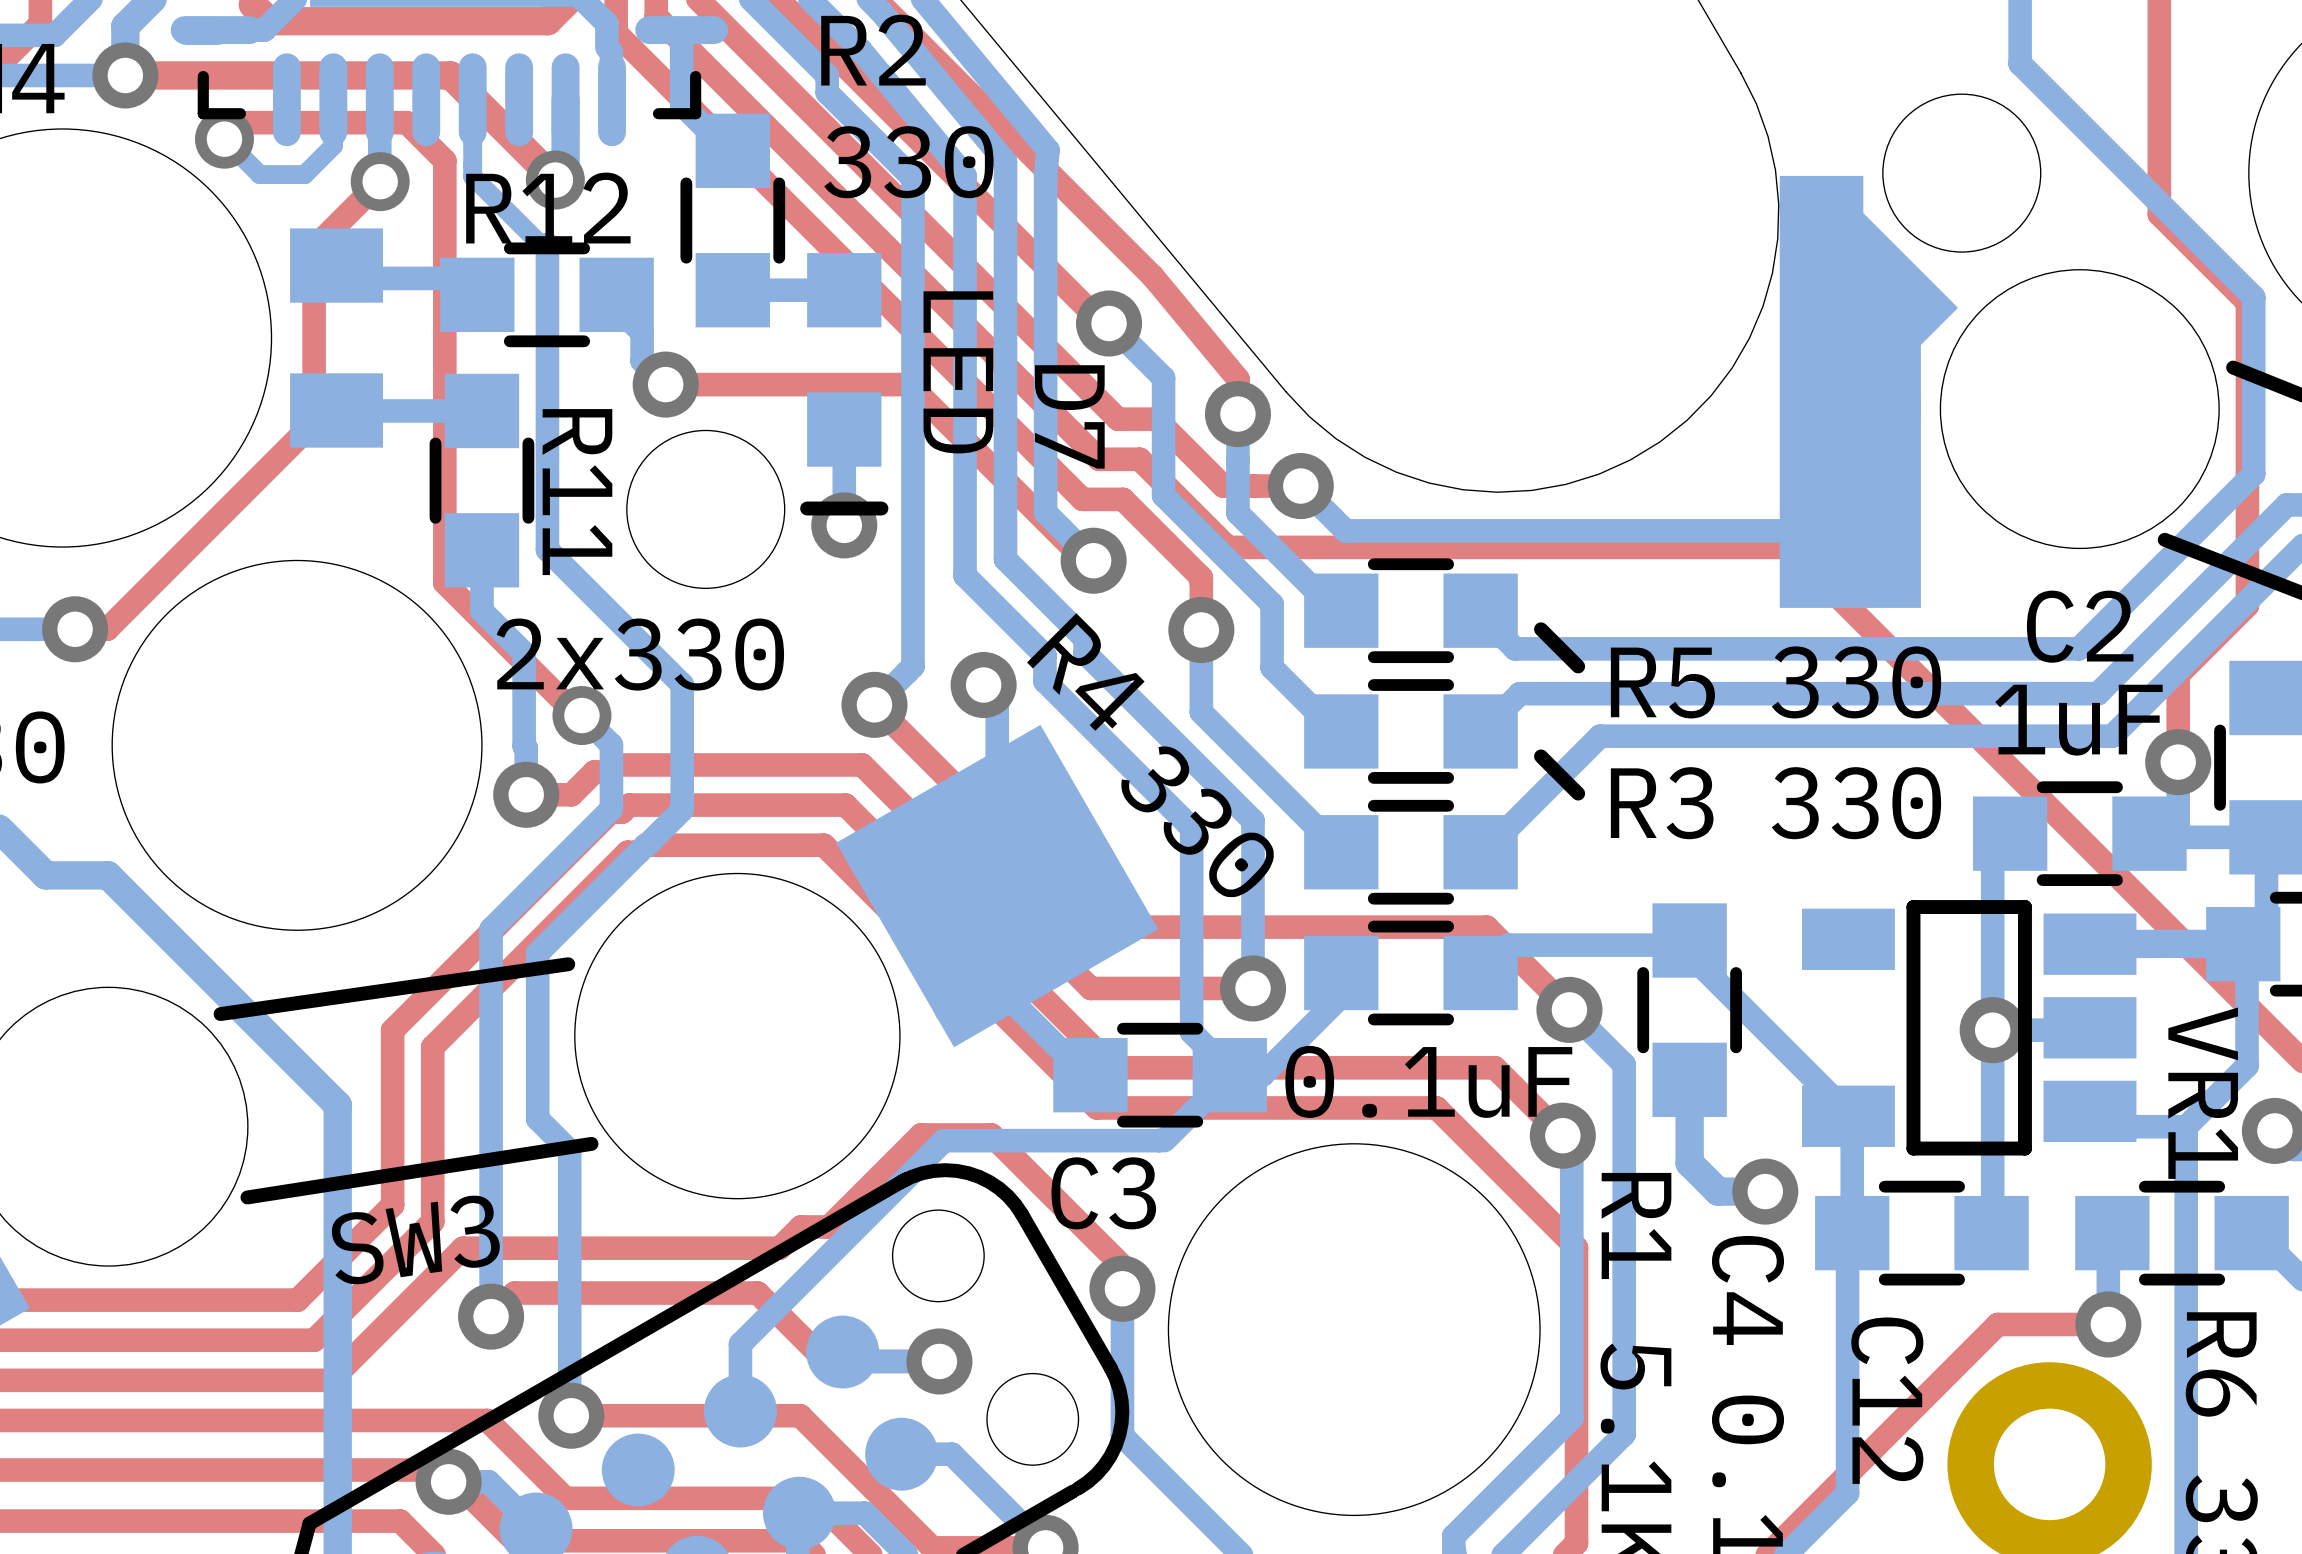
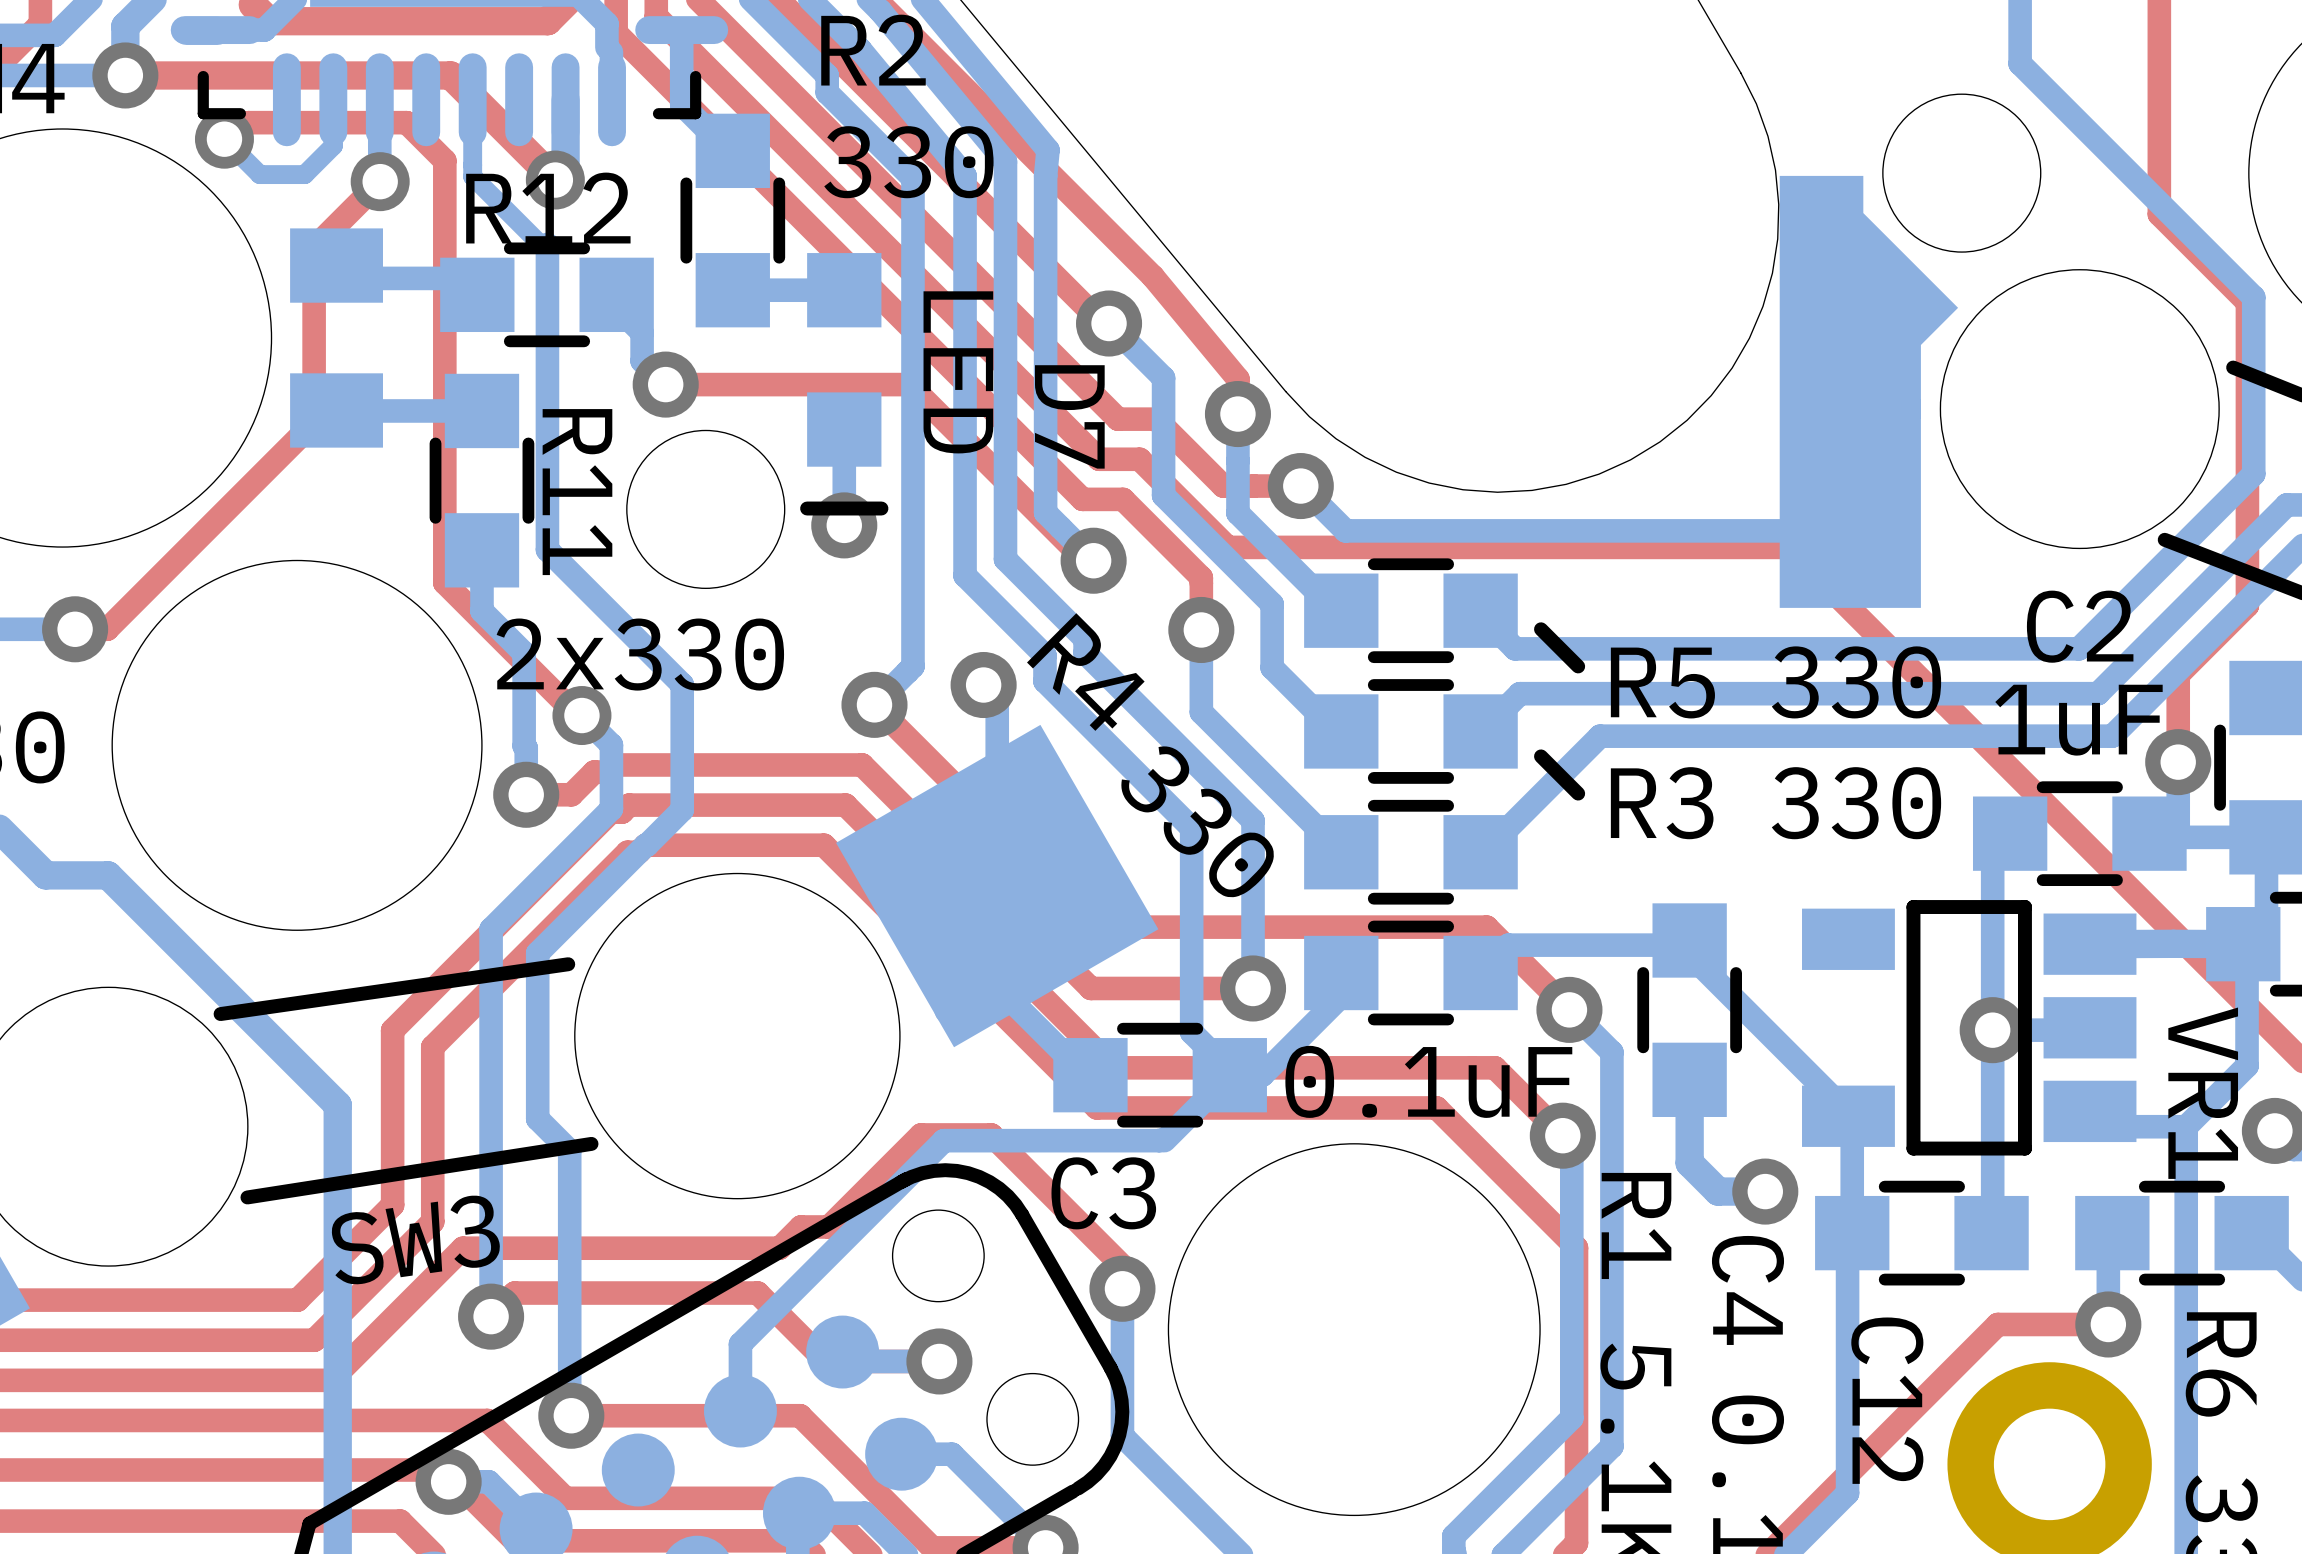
bottom track: (1611, 1052) (1624, 1064) (1624, 1434) (1611, 1446) -> (1611, 1052) (1611, 1446)

